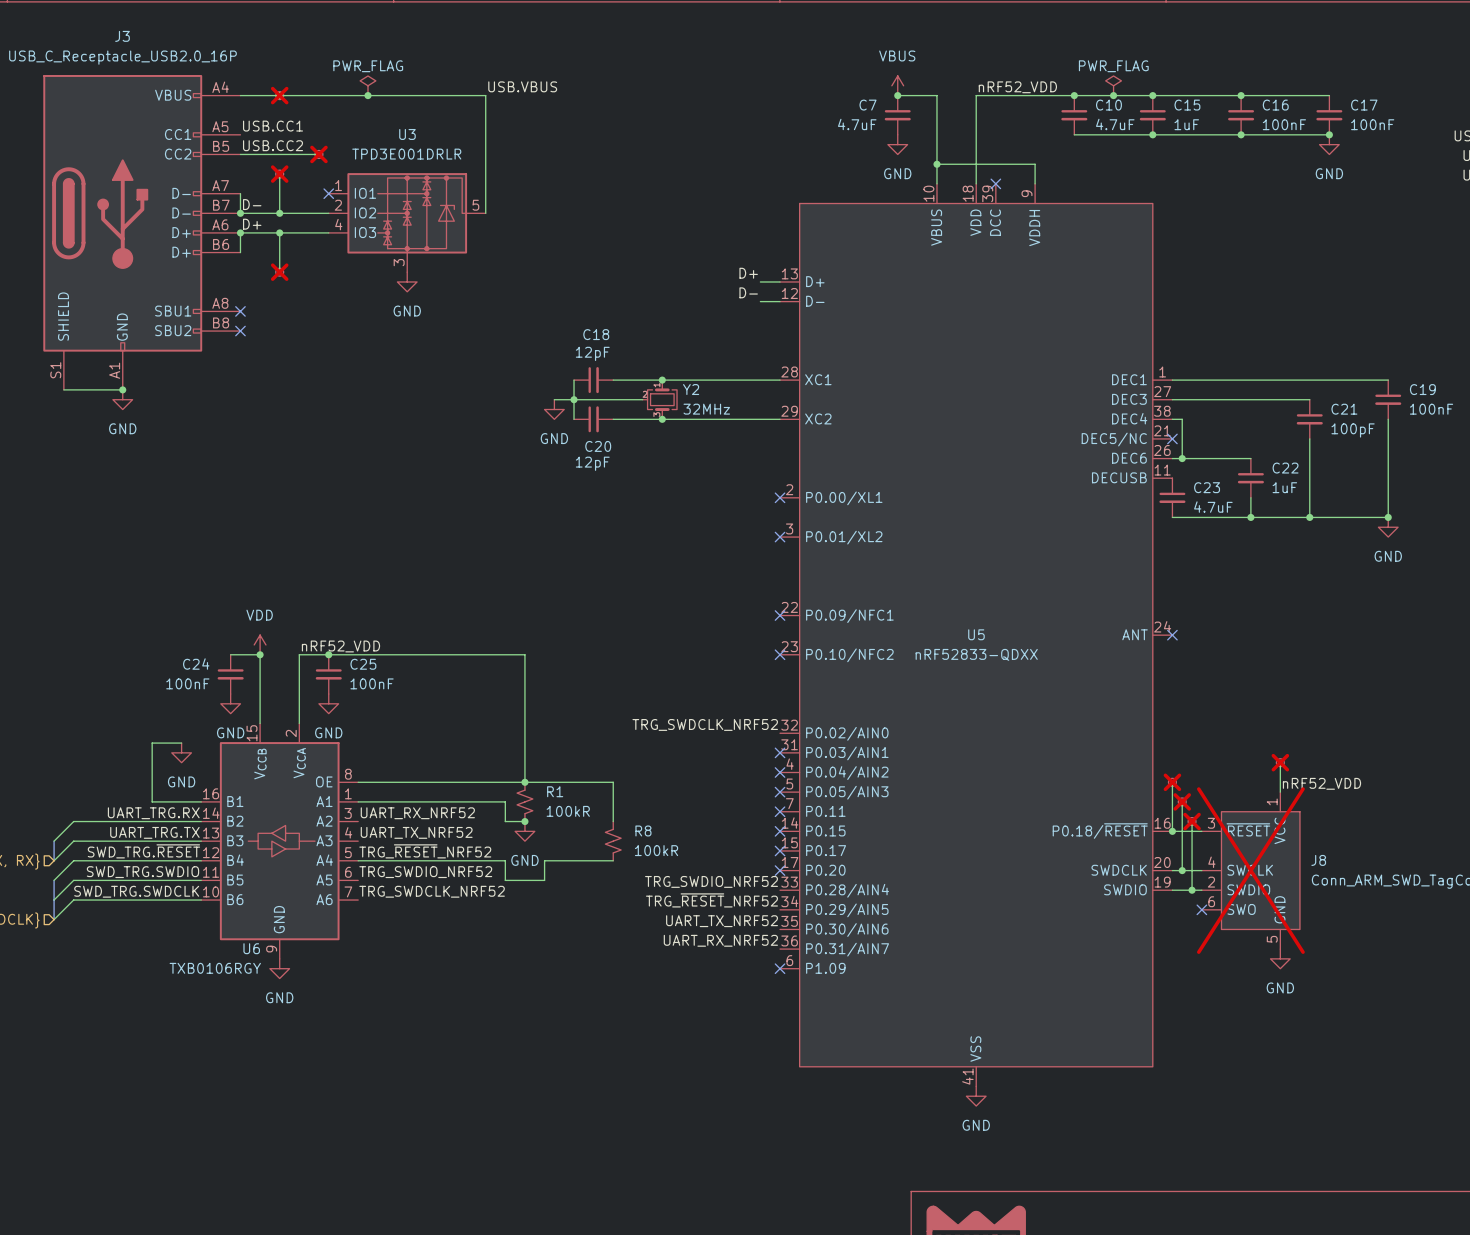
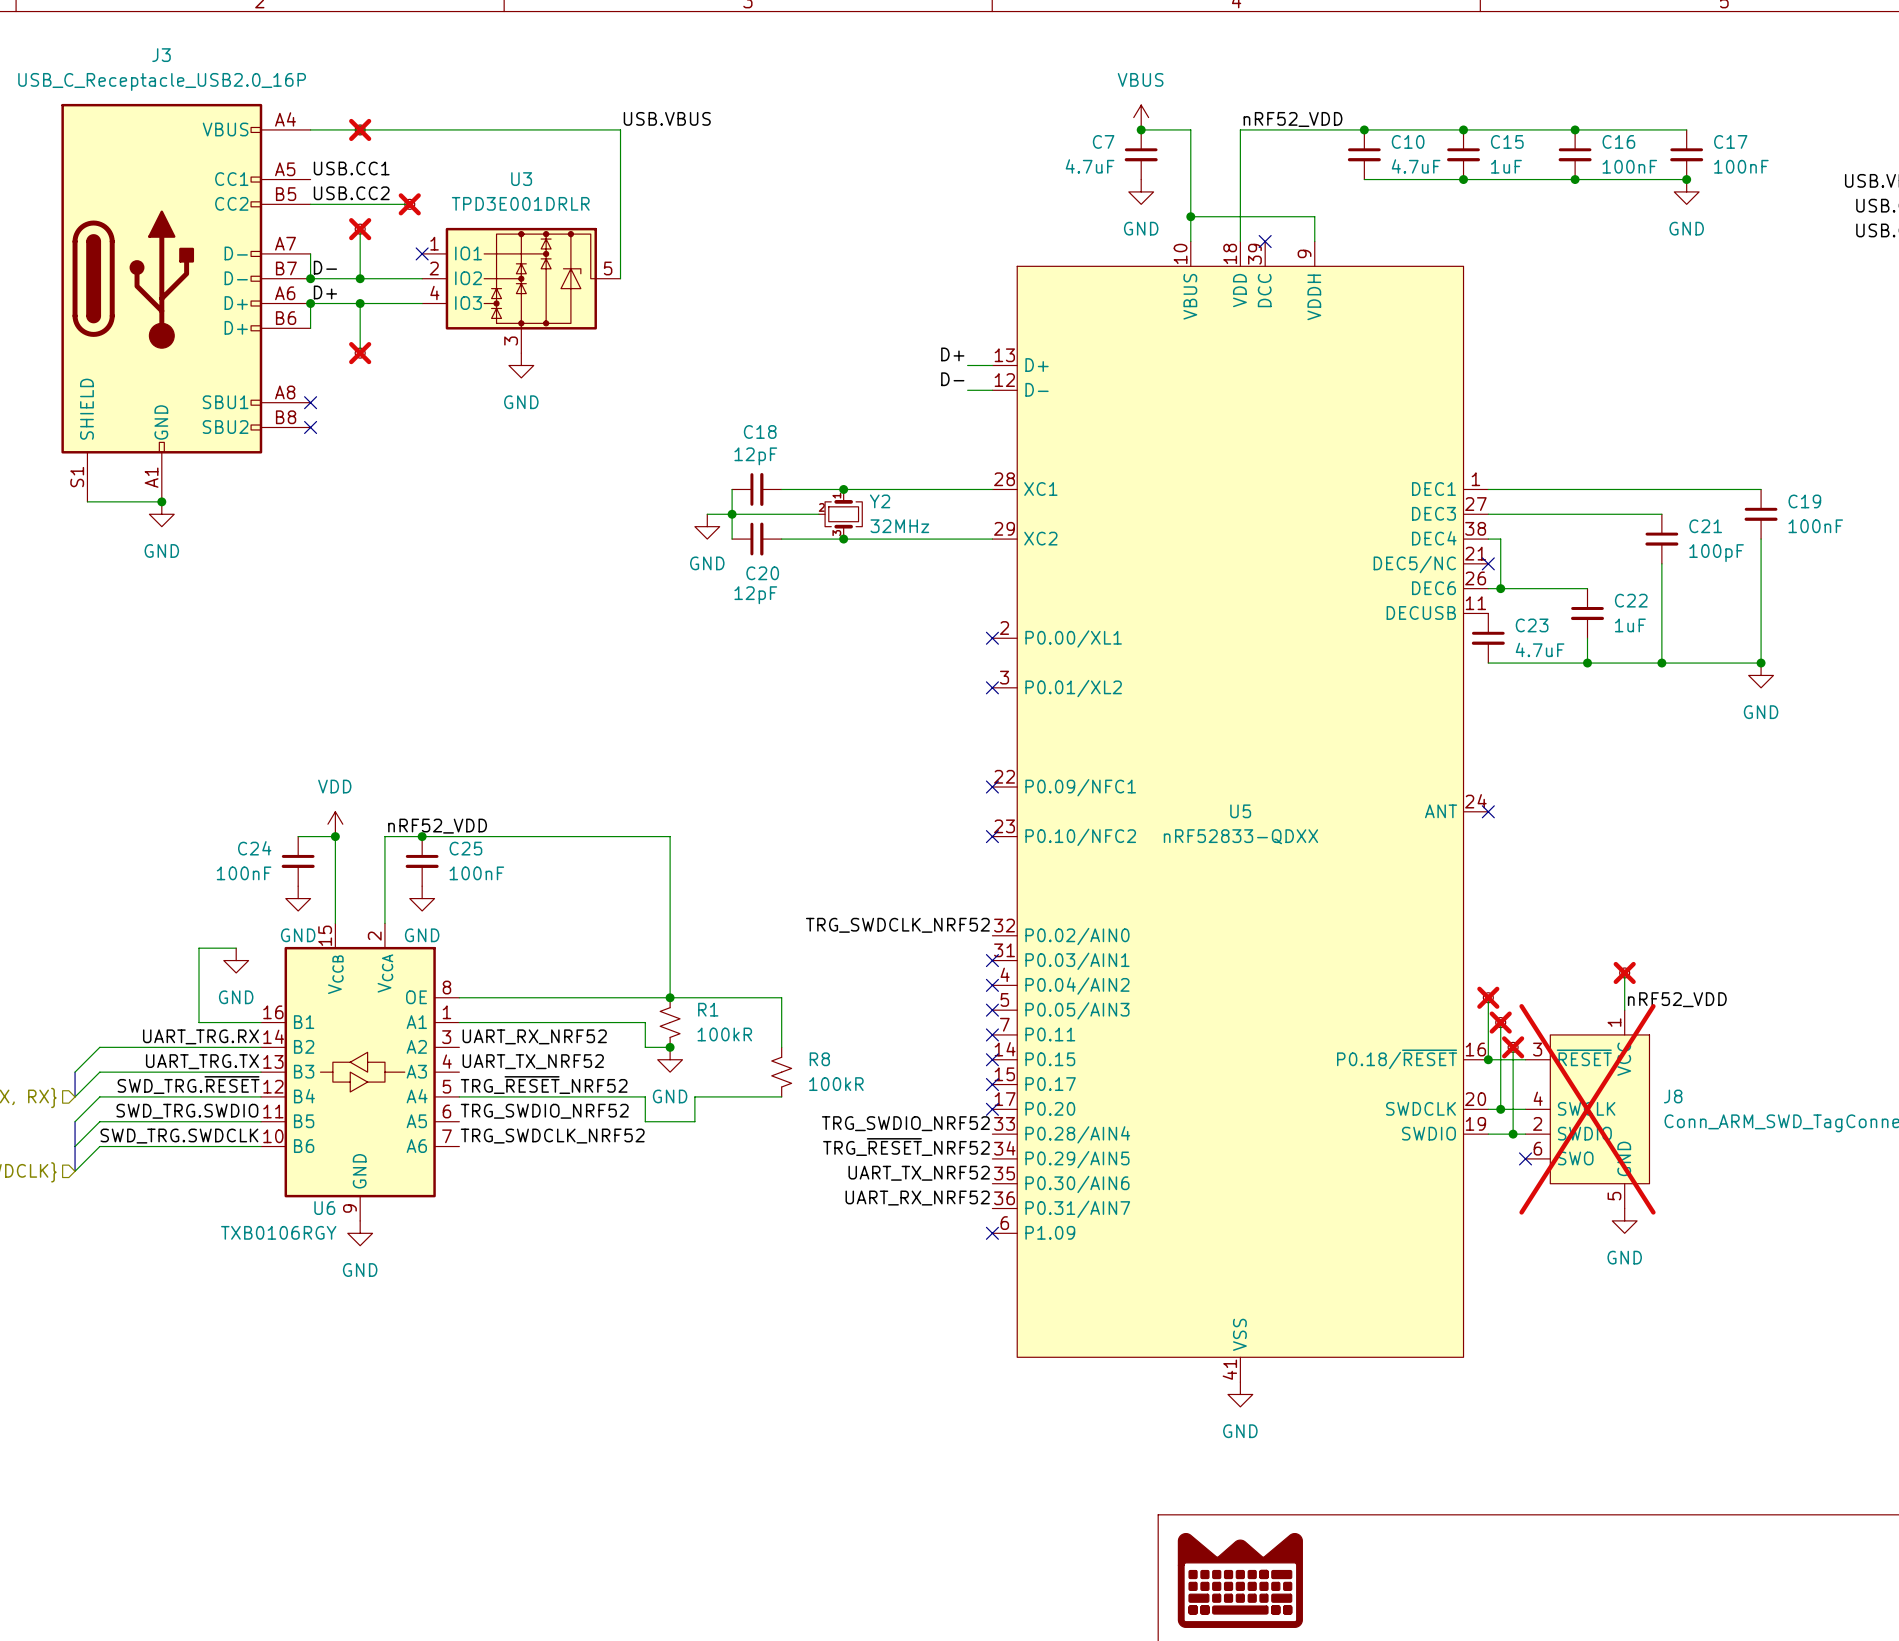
power symbol: PWR_FLAG (367, 85) -> none
power symbol: PWR_FLAG (1113, 85) -> none
junction: (367, 95) -> none
junction: (1113, 95) -> none

